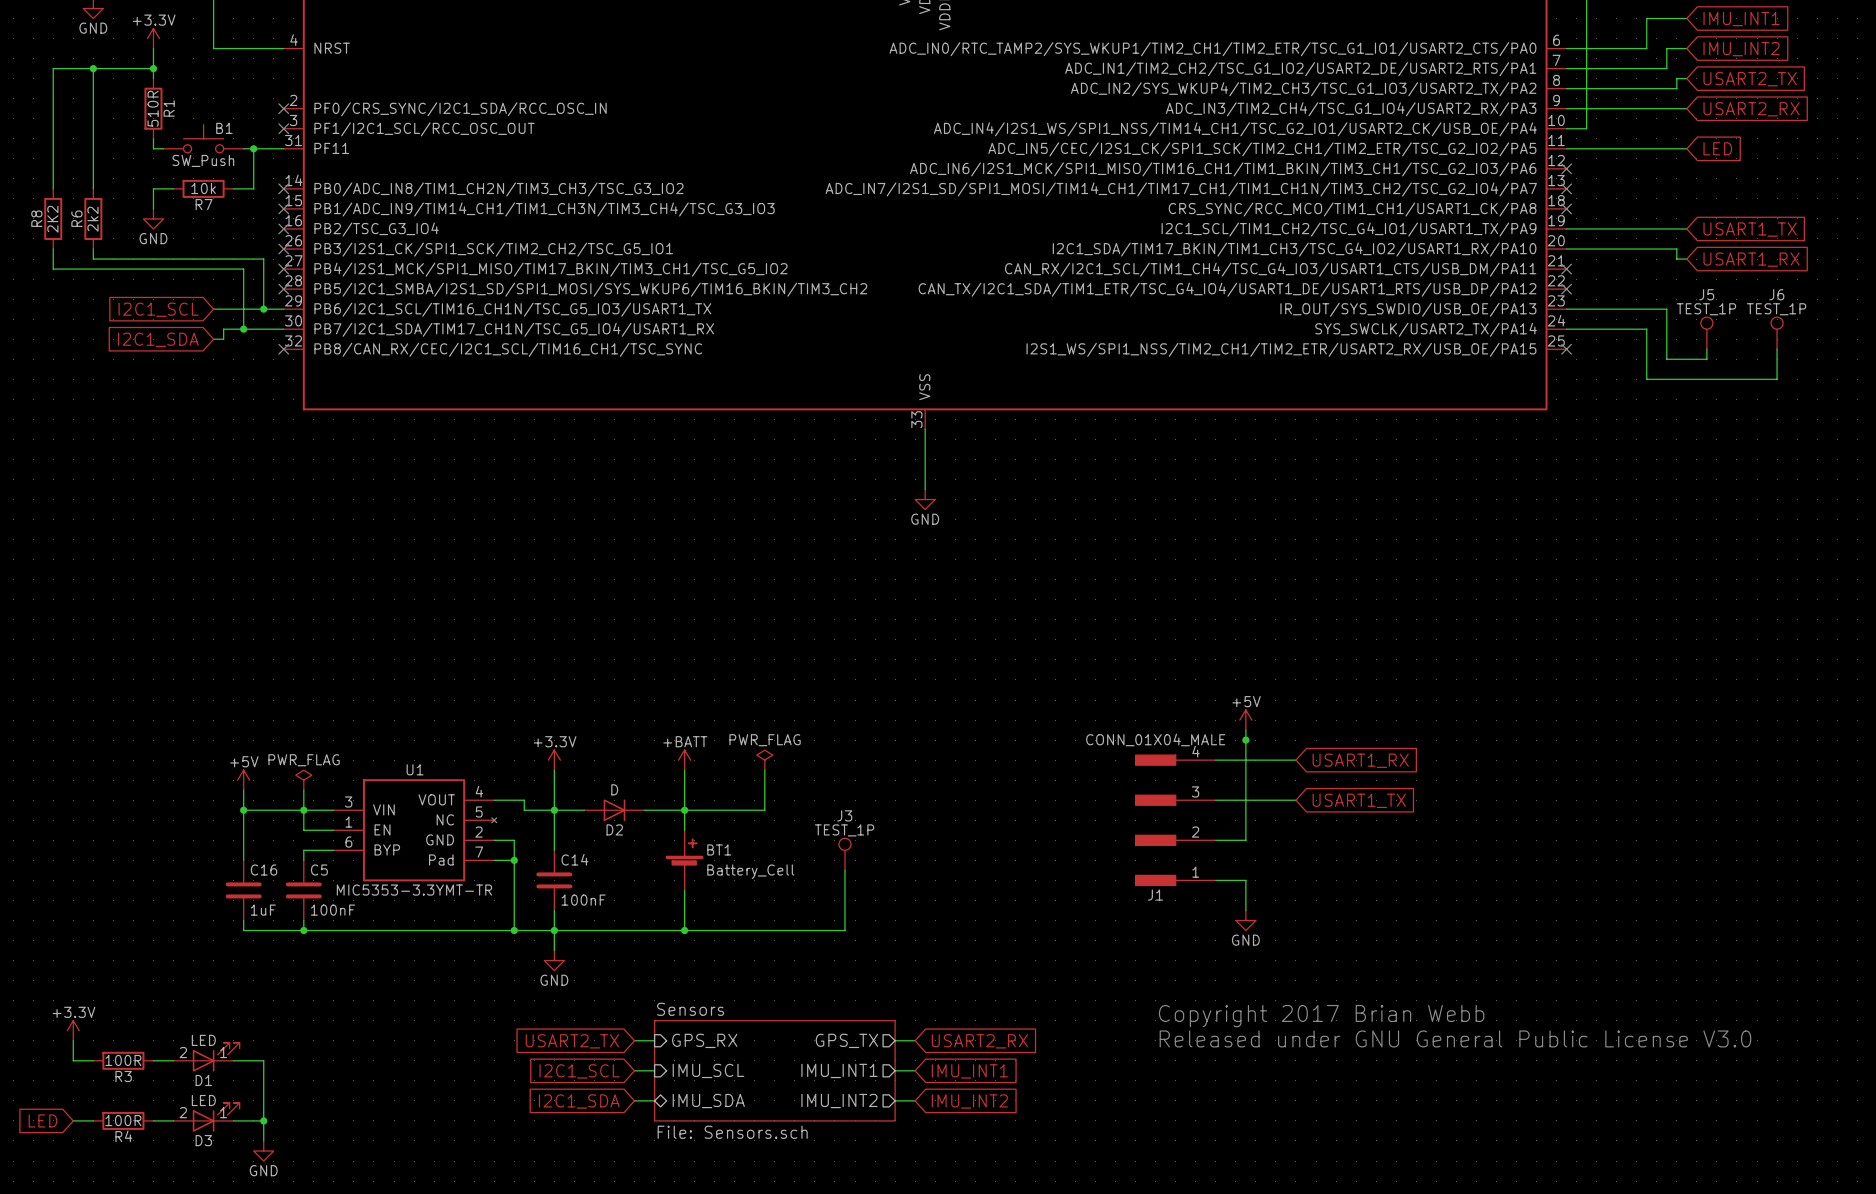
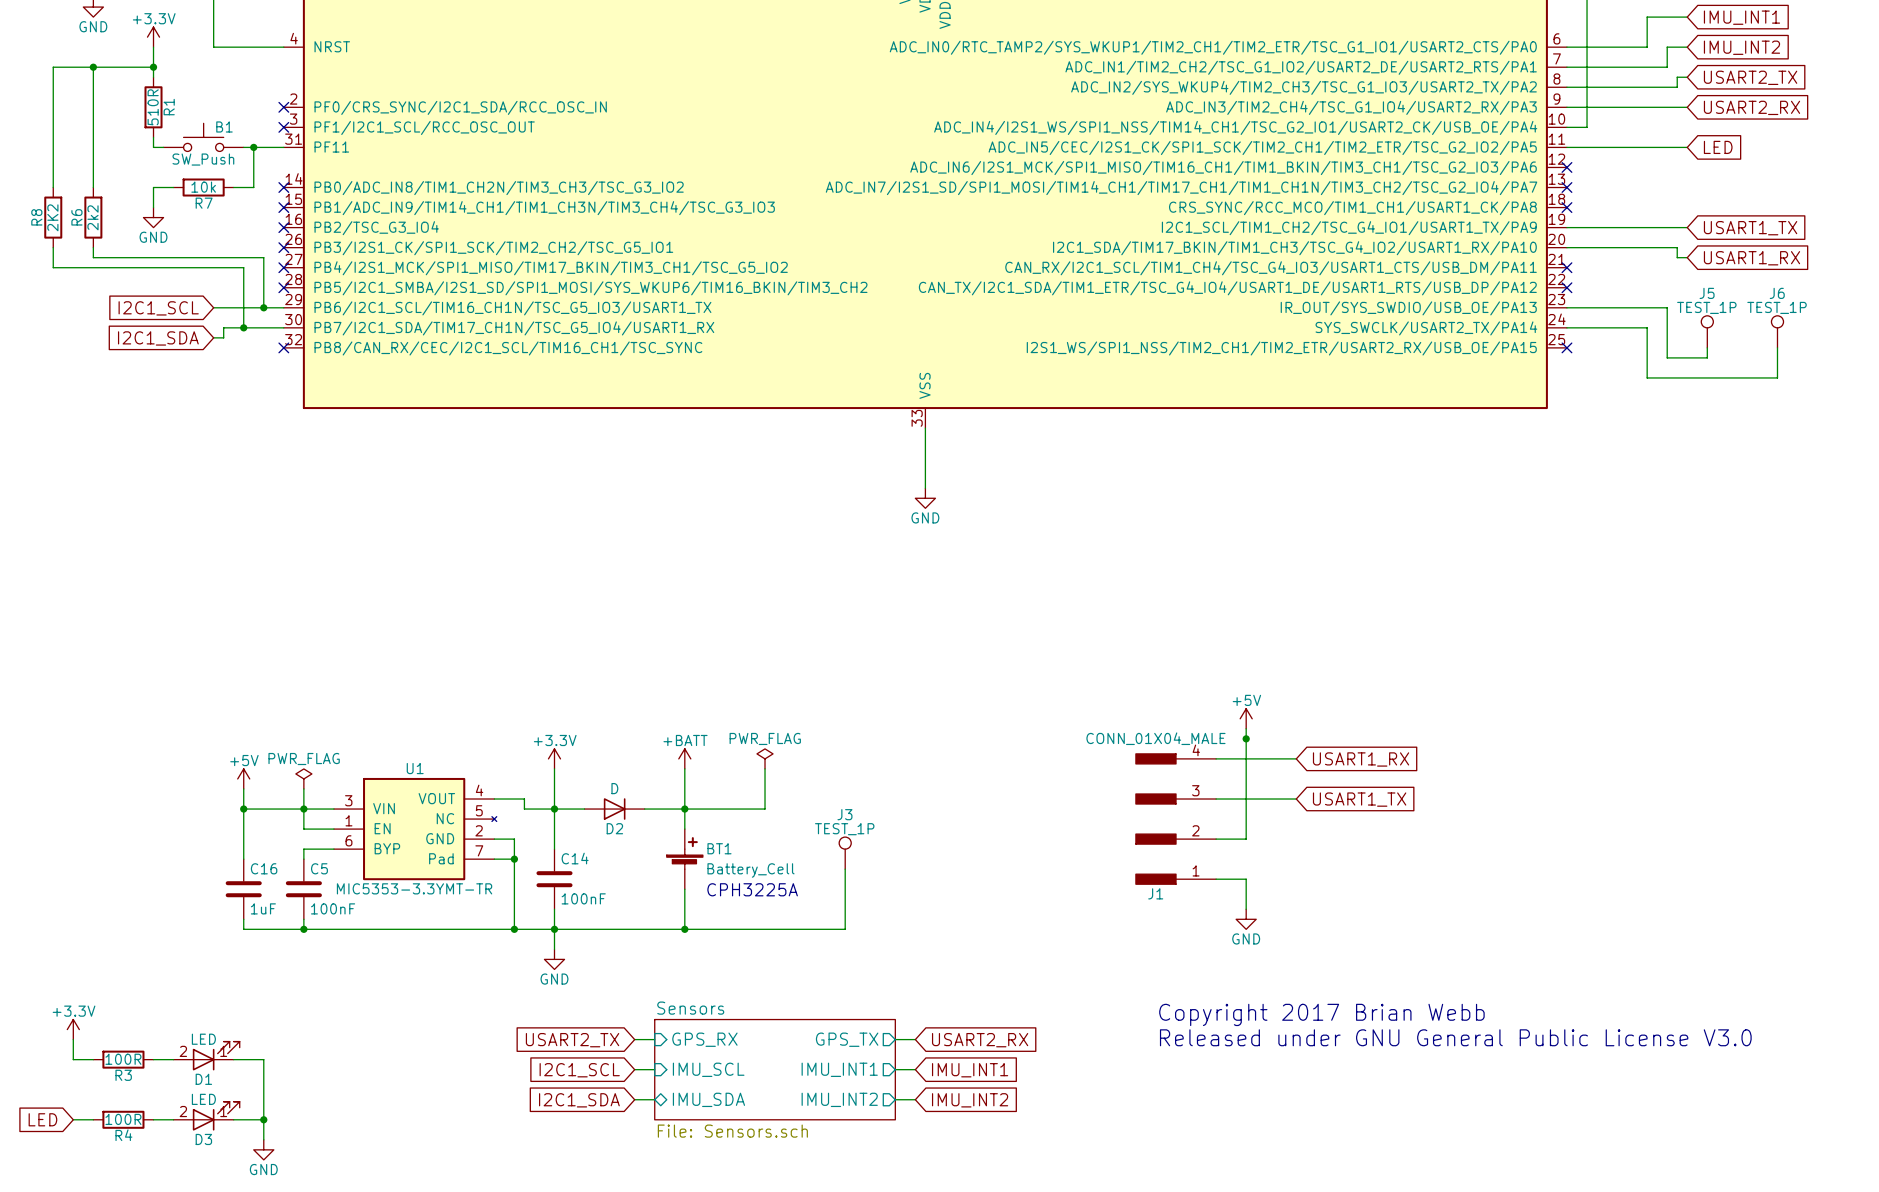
text: none -> CPH3225A (752, 889)

